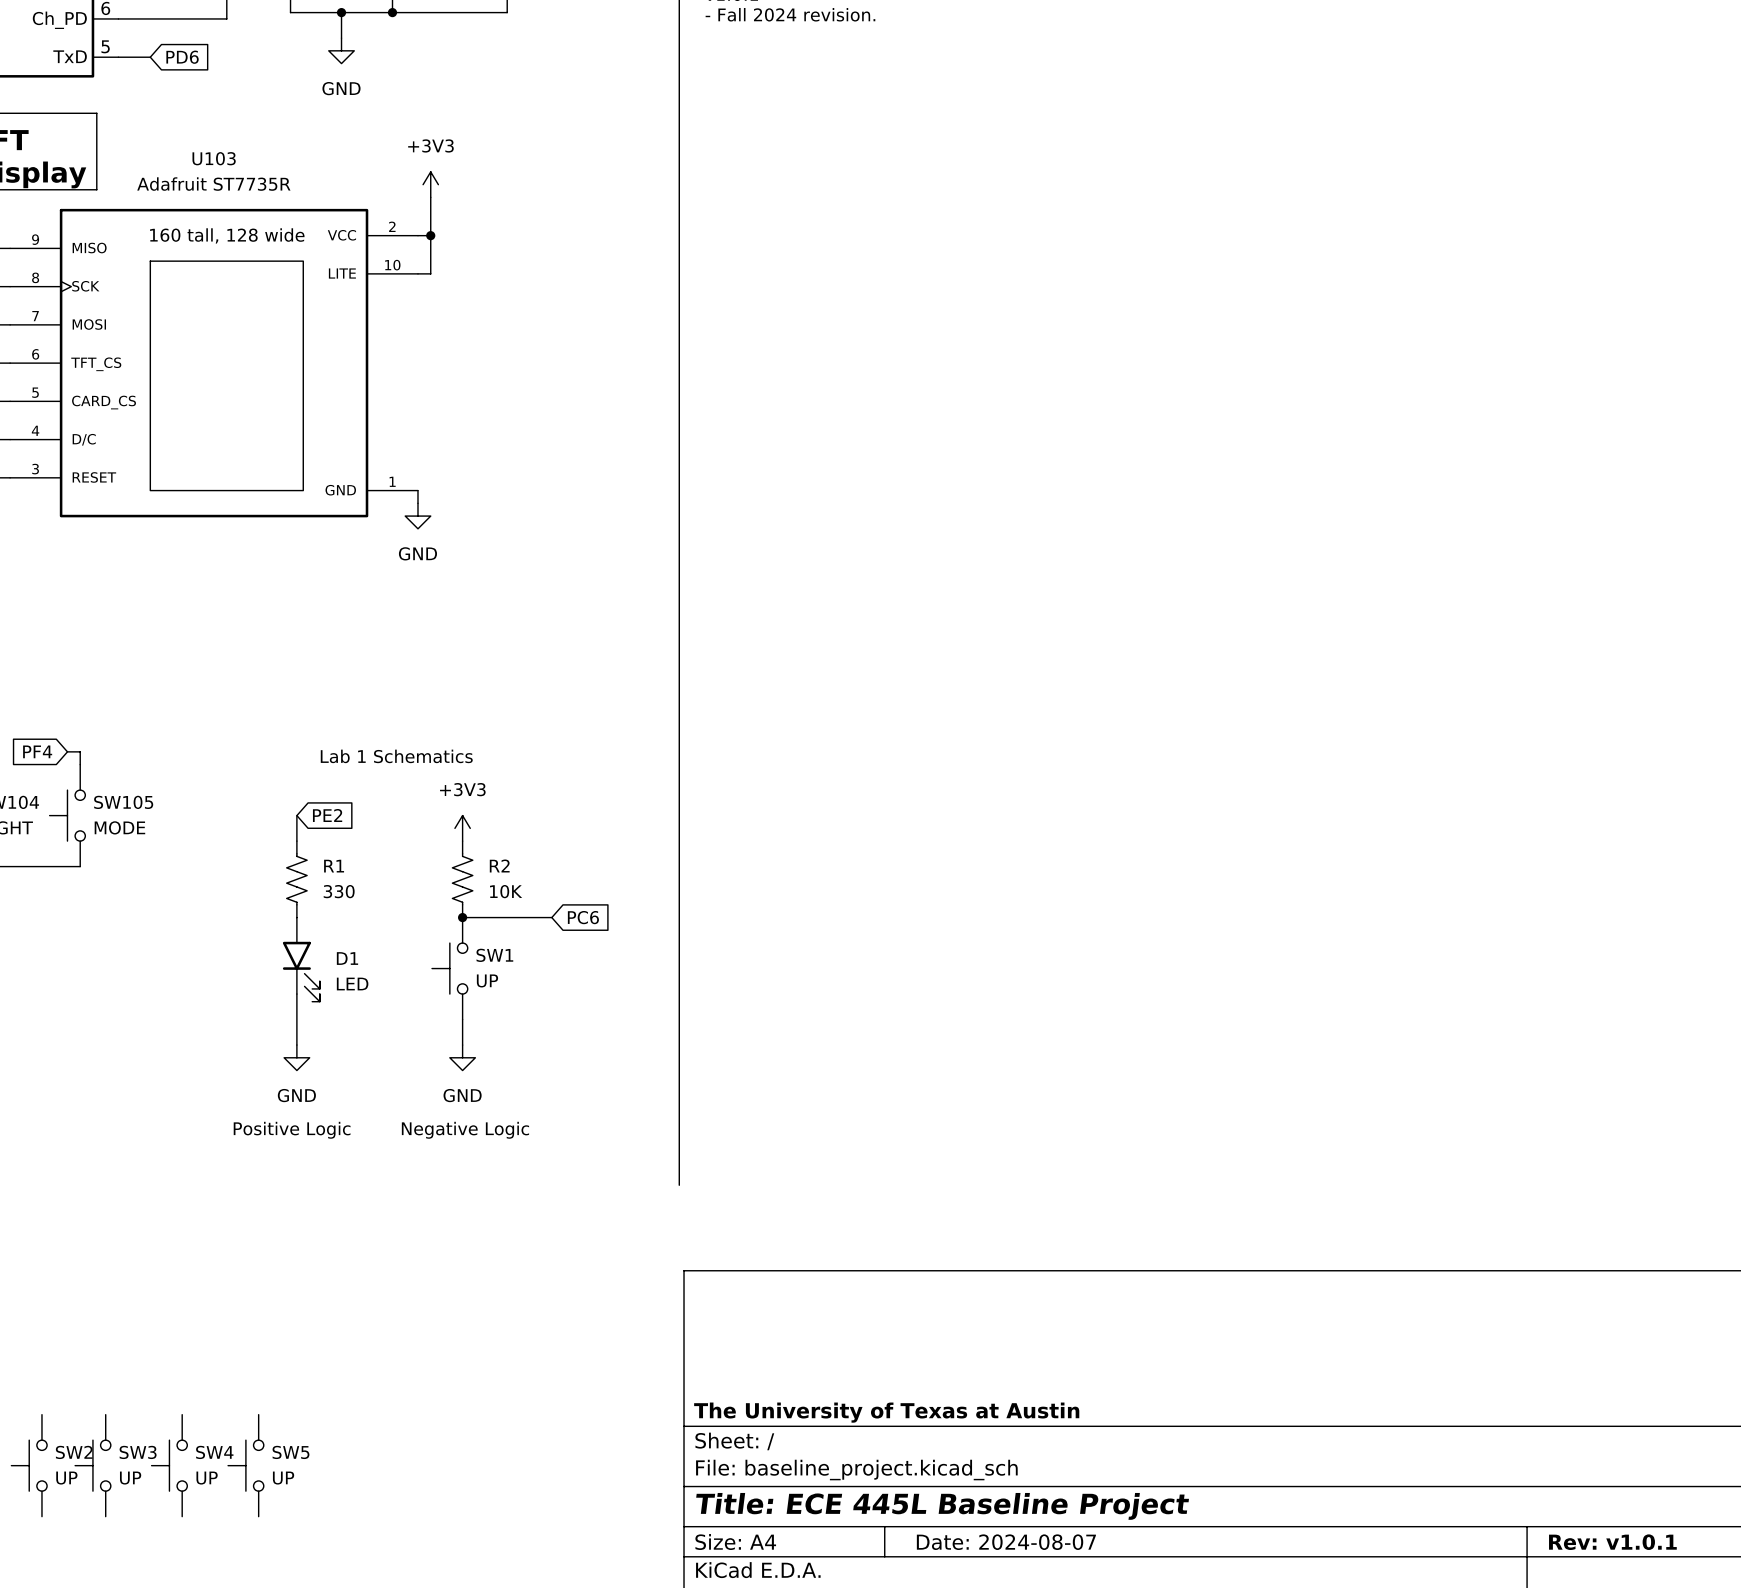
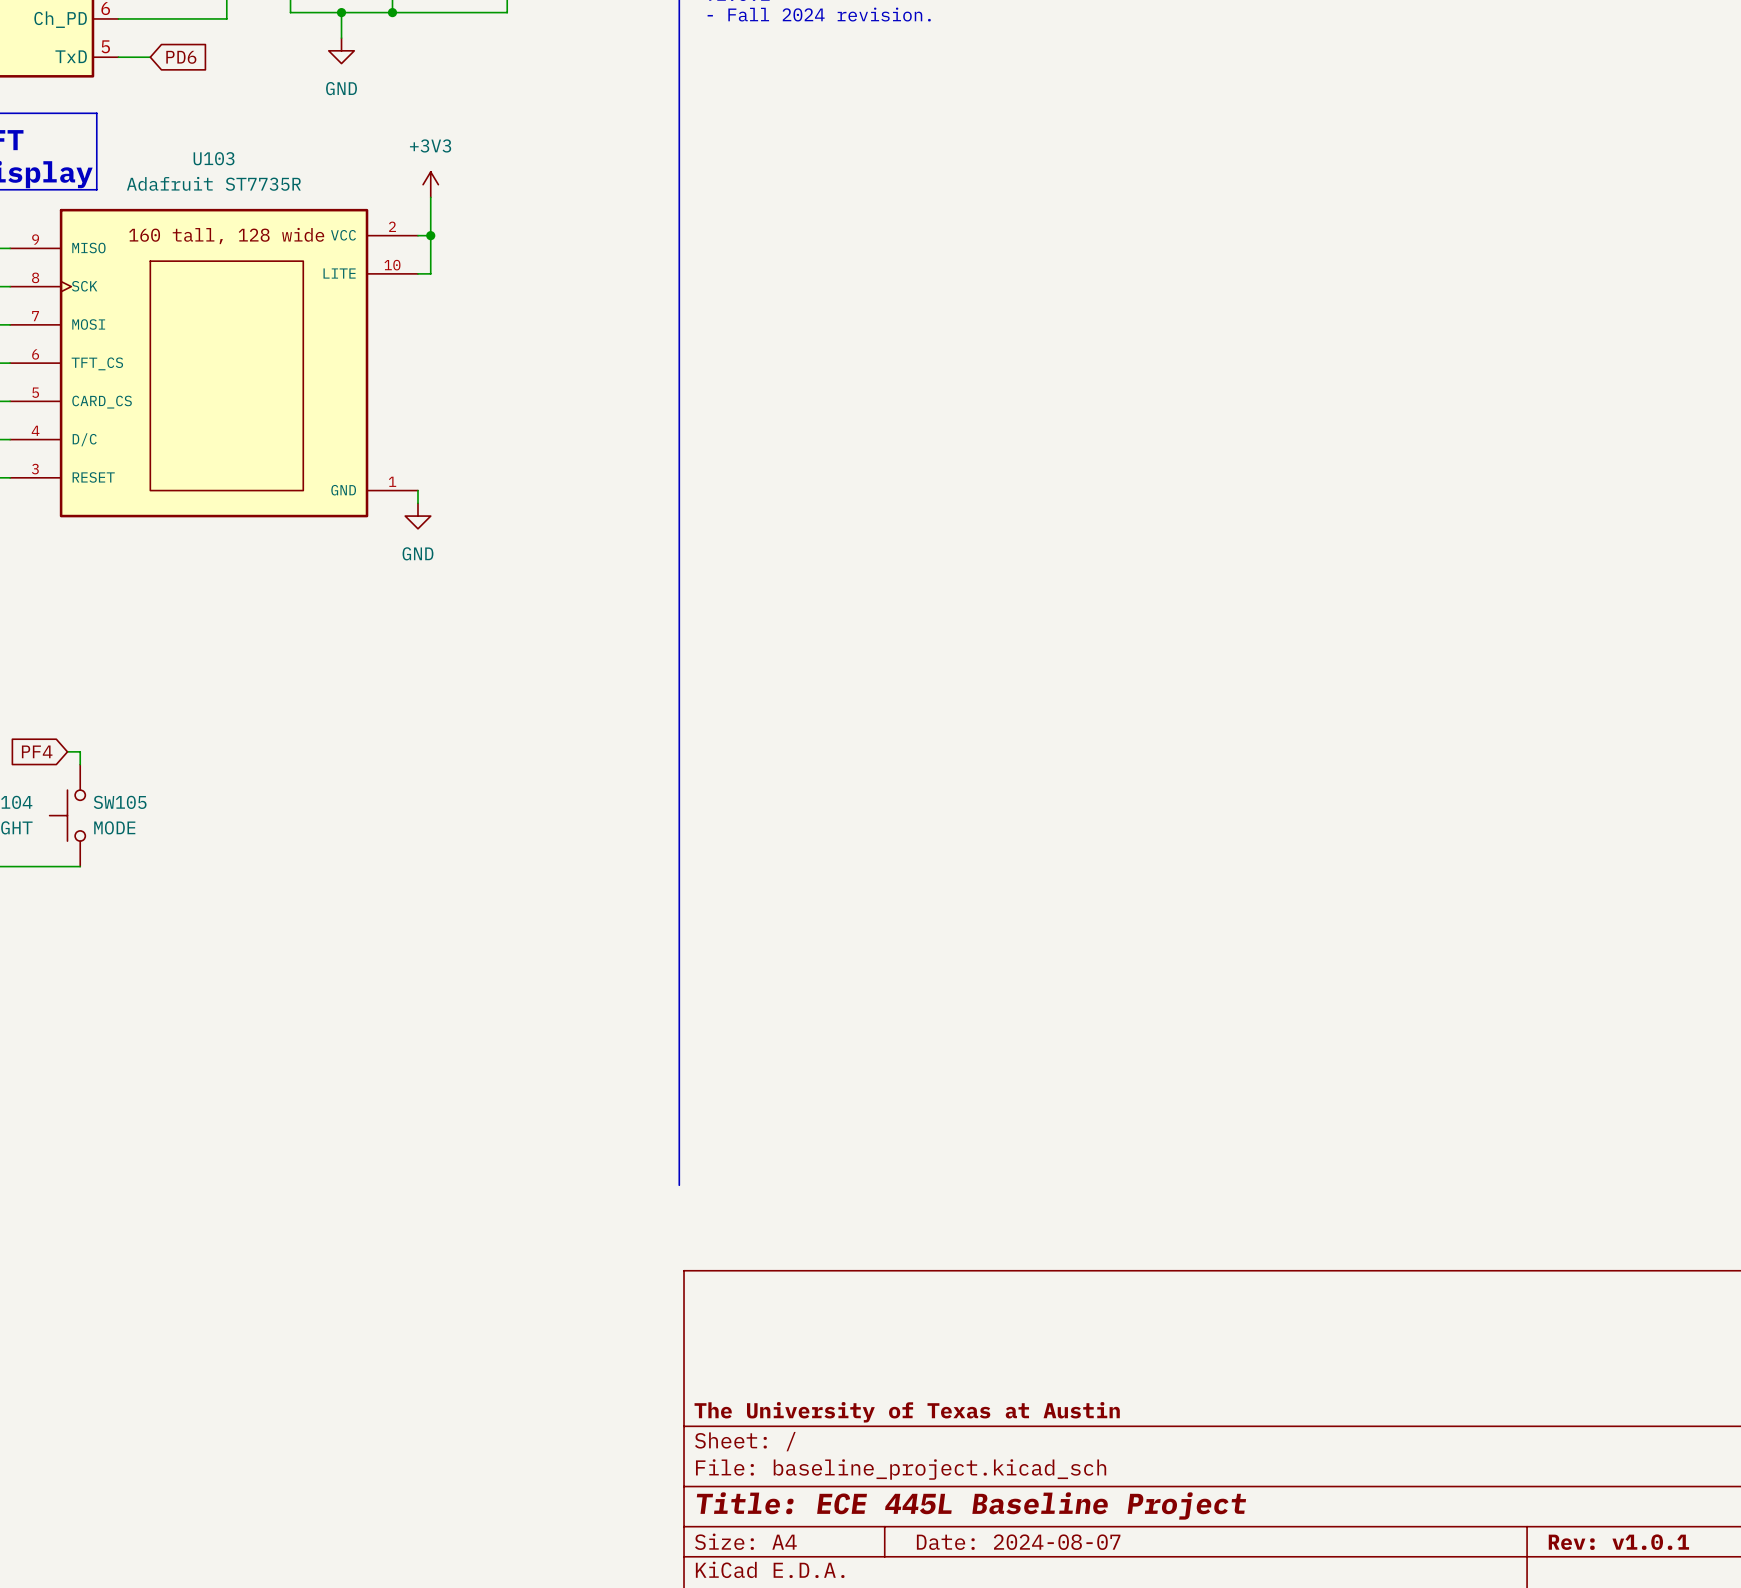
text: Lab 1 Schematics (396, 756) -> none
wire: (296, 815) (296, 841) -> none
global label: PE2 (327, 815) -> none
power symbol: +3V3 (462, 828) -> none
R1: 330 (296, 879) -> none
R2: 10K (462, 879) -> none
wire: (462, 917) (551, 917) -> none
junction: (462, 917) -> none
global label: PC6 (583, 917) -> none
D1: LED (301, 959) -> none
SW1: UP (449, 968) -> none
wire: (296, 994) (296, 1045) -> none
wire: (462, 1019) (462, 1045) -> none
power symbol: GND (296, 1057) -> none
power symbol: GND (462, 1057) -> none
text: Positive Logic (292, 1130) -> none
text: Negative Logic (465, 1130) -> none
SW2: UP (29, 1465) -> none
SW3: UP (92, 1465) -> none
SW4: UP (169, 1465) -> none
SW5: UP (245, 1465) -> none

